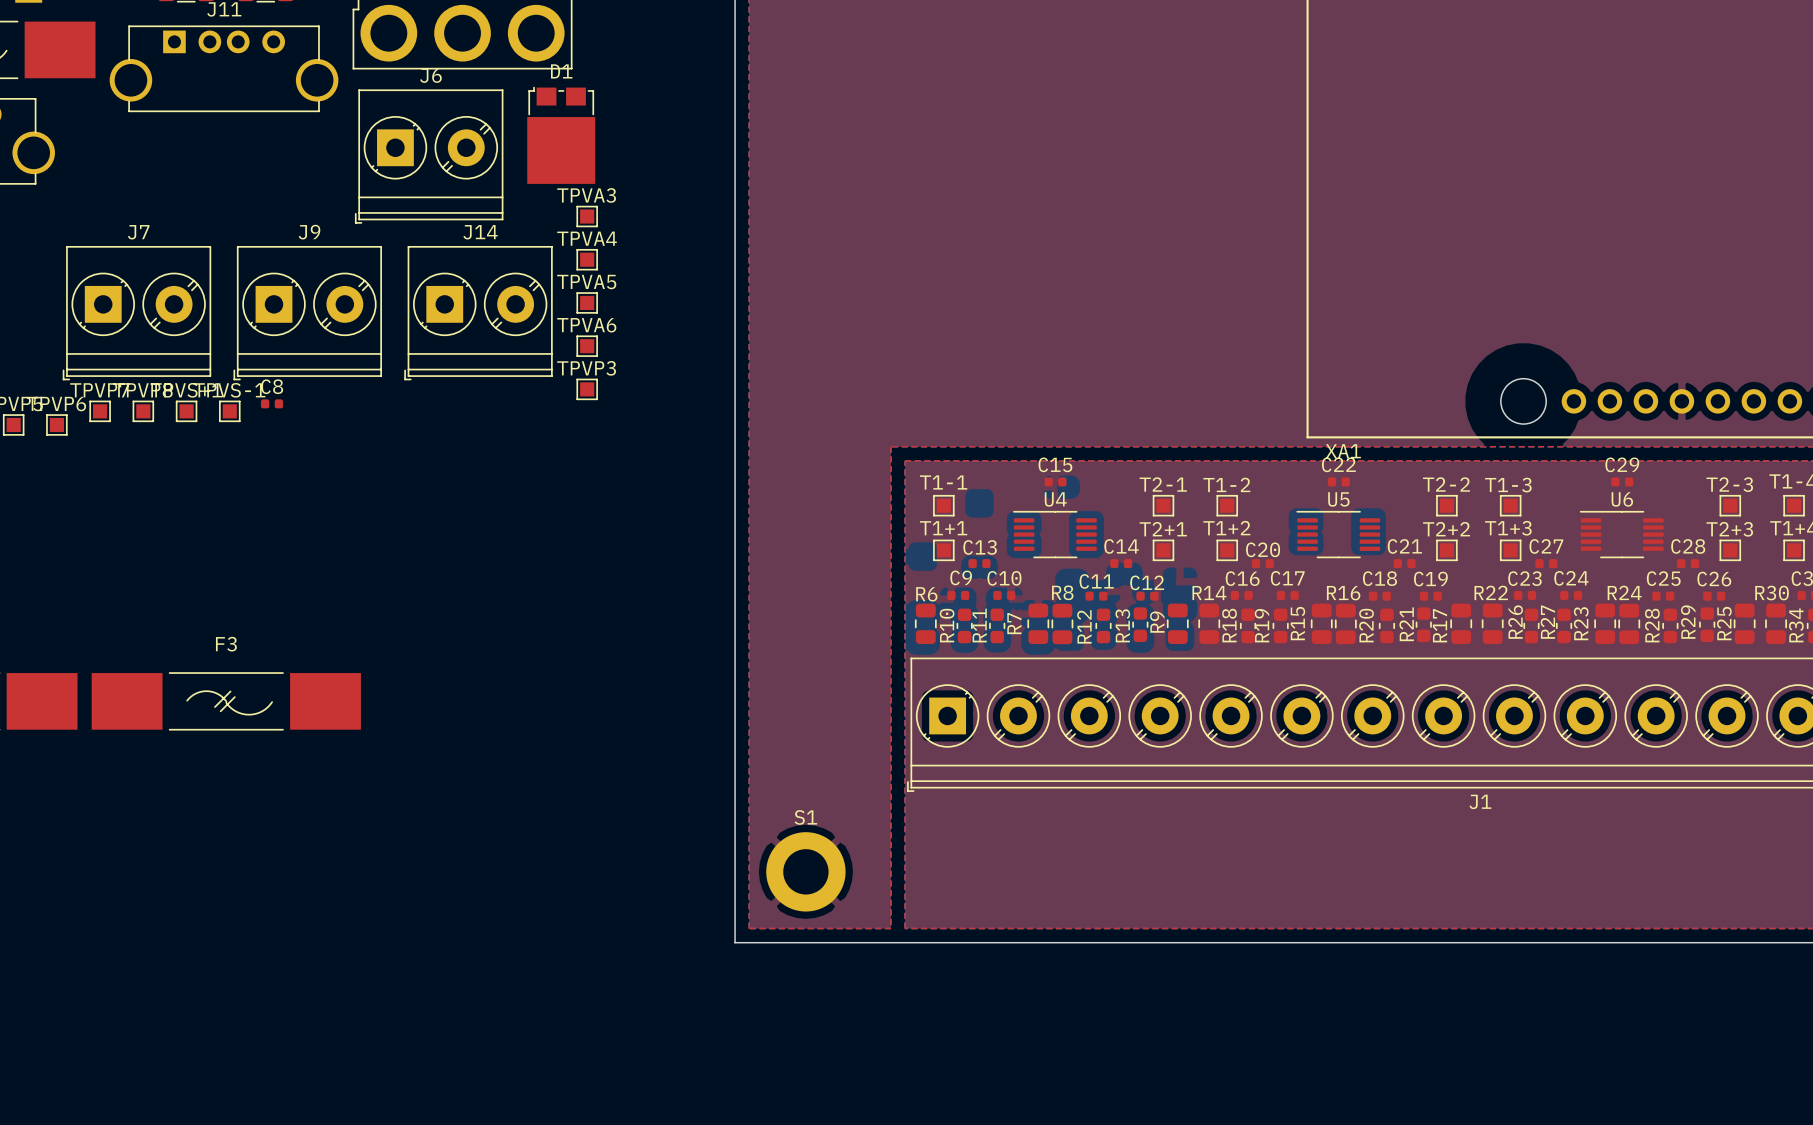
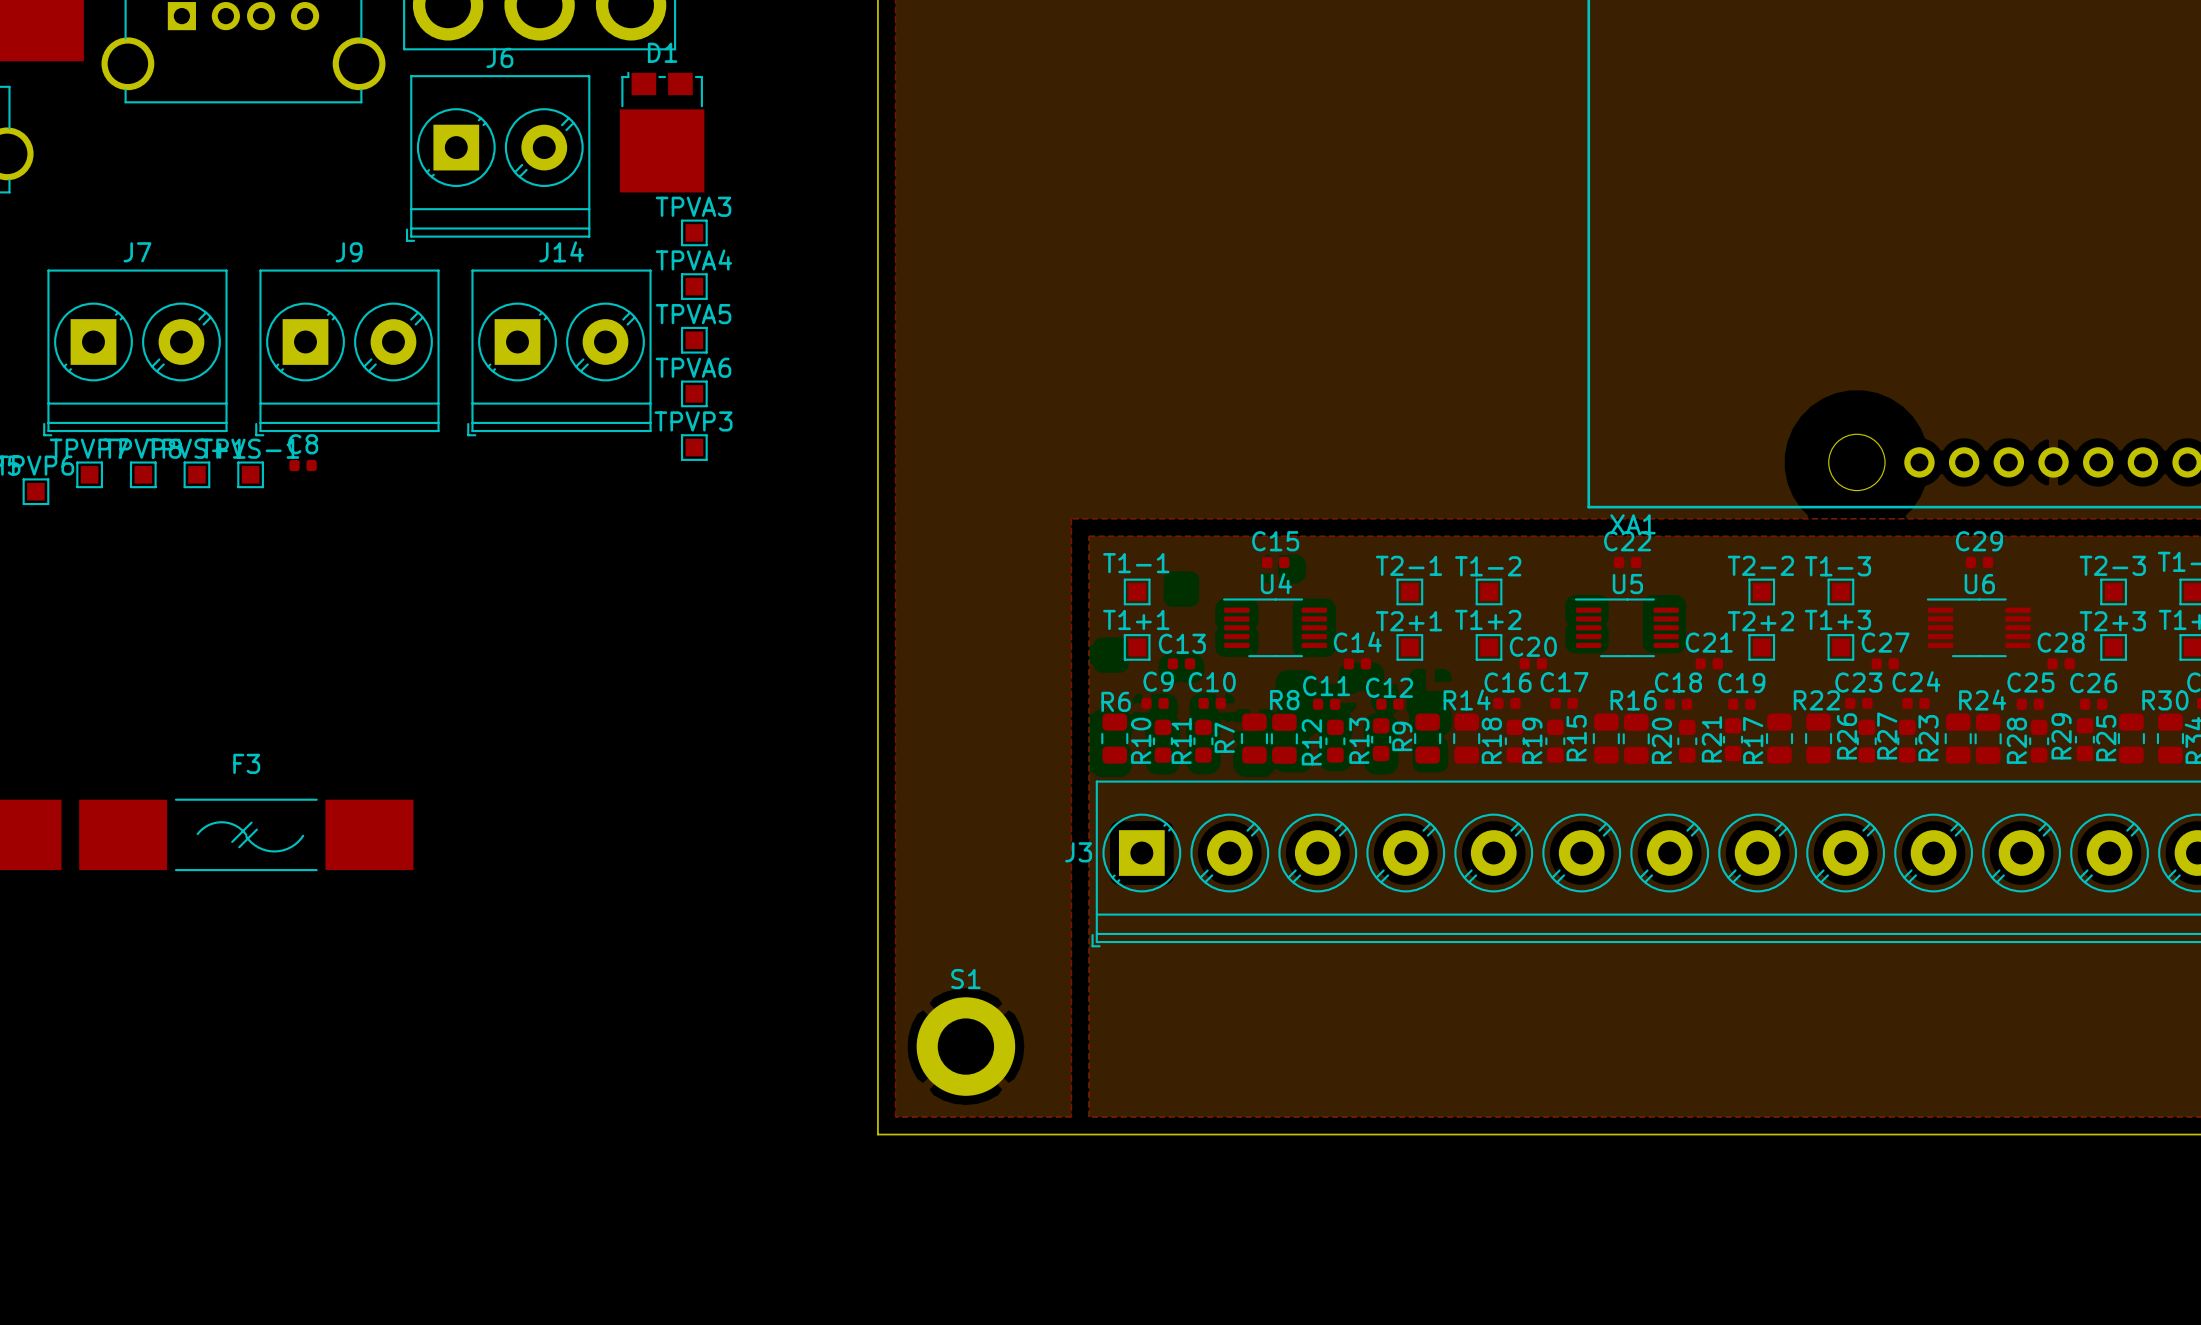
J1 name: J1 (1480, 801) -> J3 (1078, 852)

